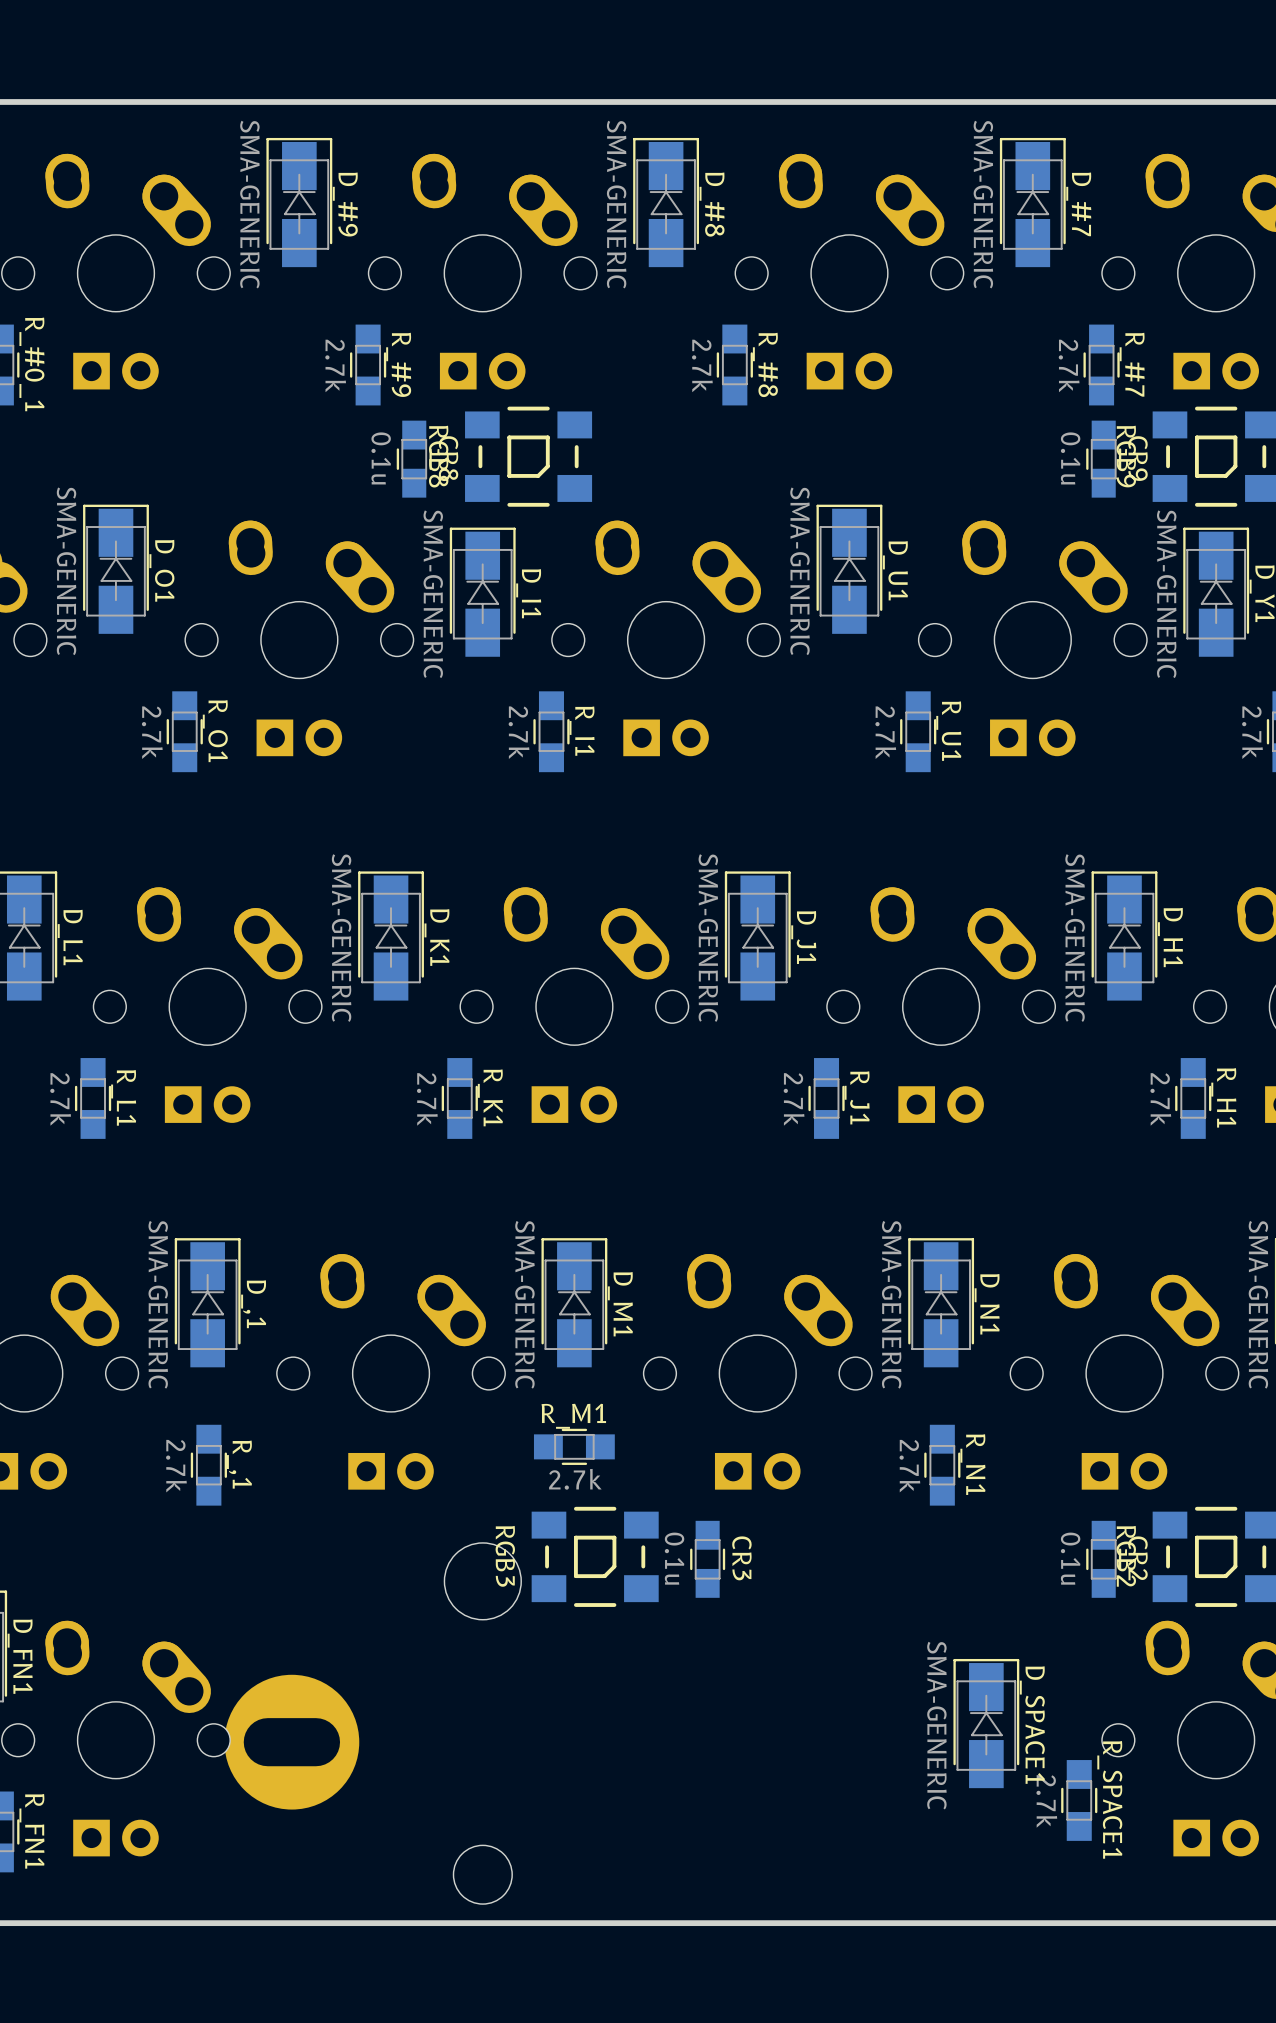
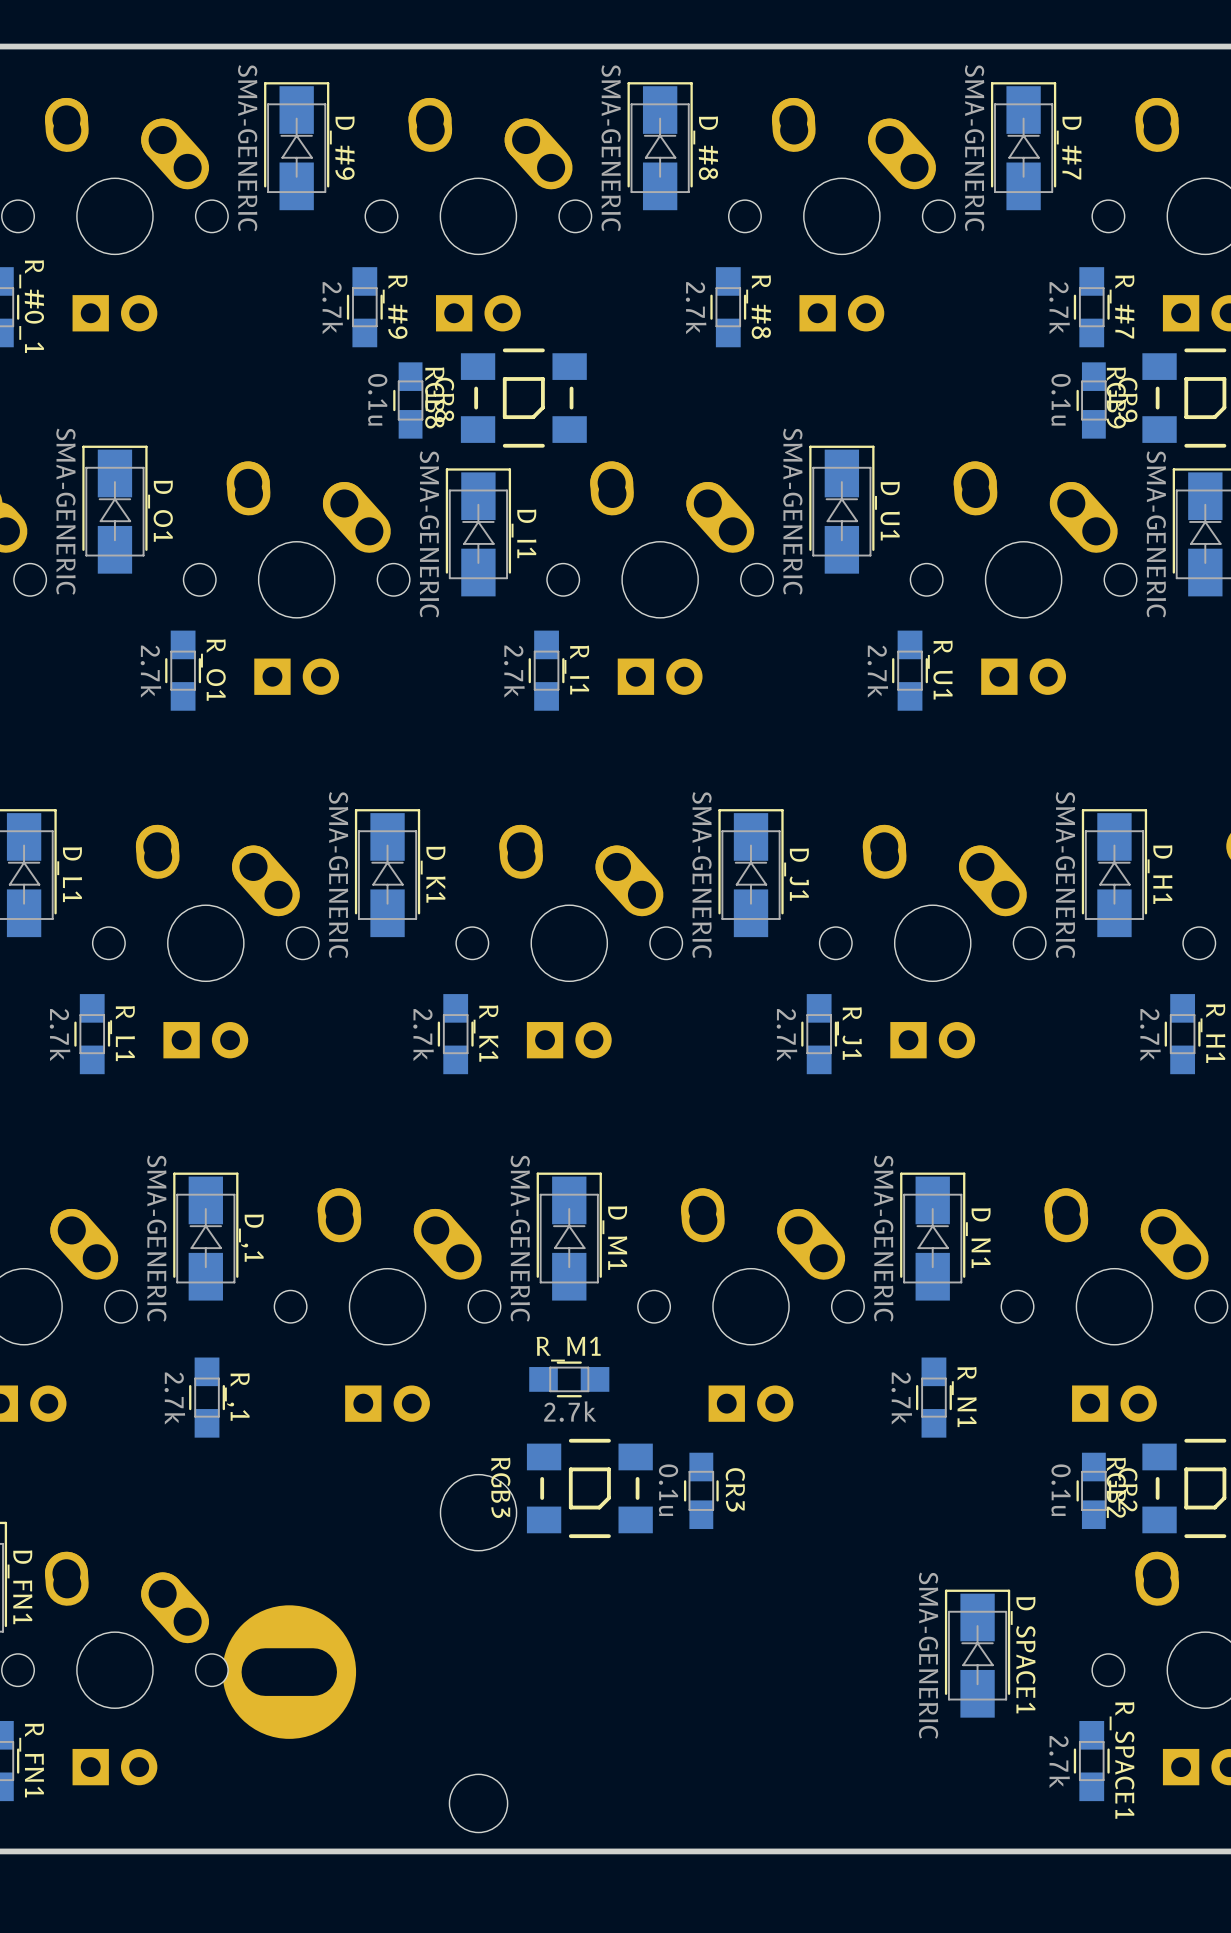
R_SPACE1 position: (1079, 1800) -> (1091, 1761)

